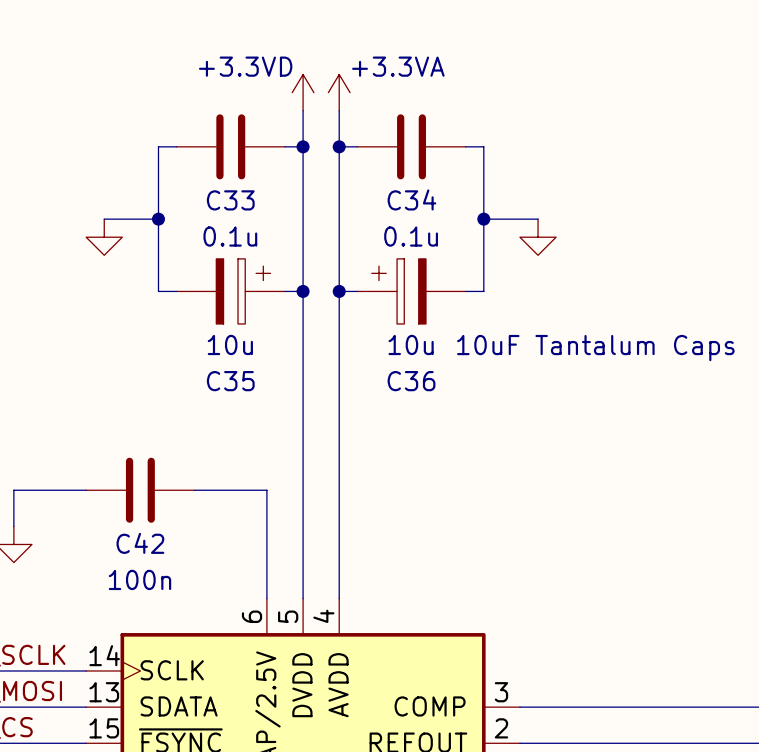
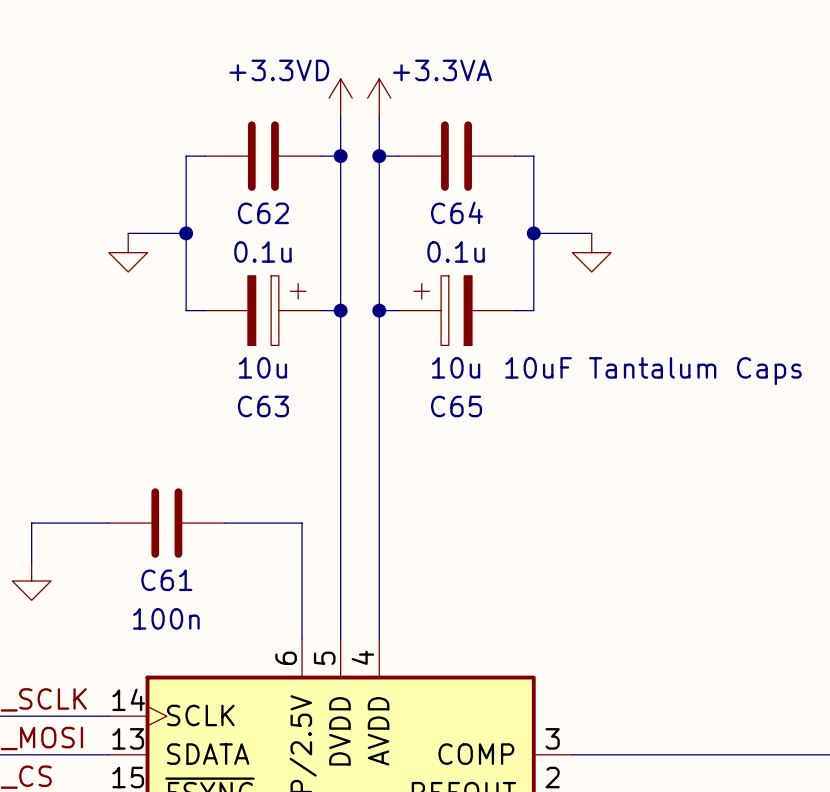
C34 name: C34 (411, 199) -> C64 (456, 212)
C33 name: C33 (230, 200) -> C62 (263, 213)
C35 name: C35 (230, 381) -> C63 (263, 406)
C36 name: C36 (411, 381) -> C65 (456, 406)
C42 name: C42 (140, 543) -> C61 (166, 580)

